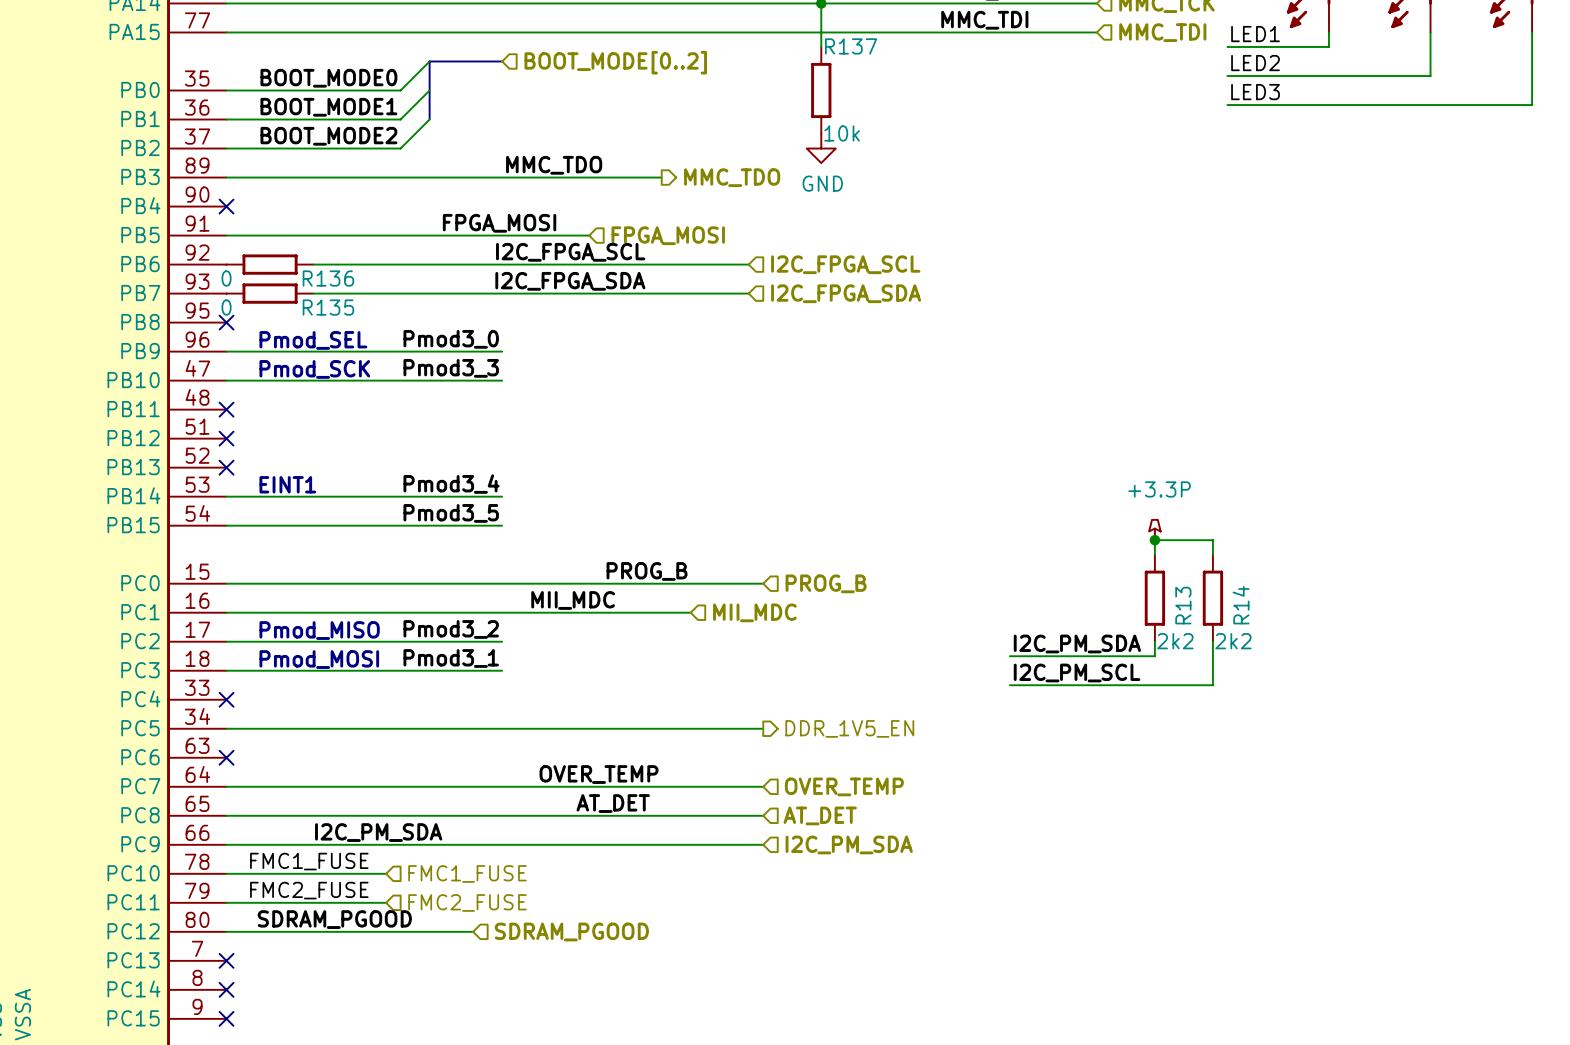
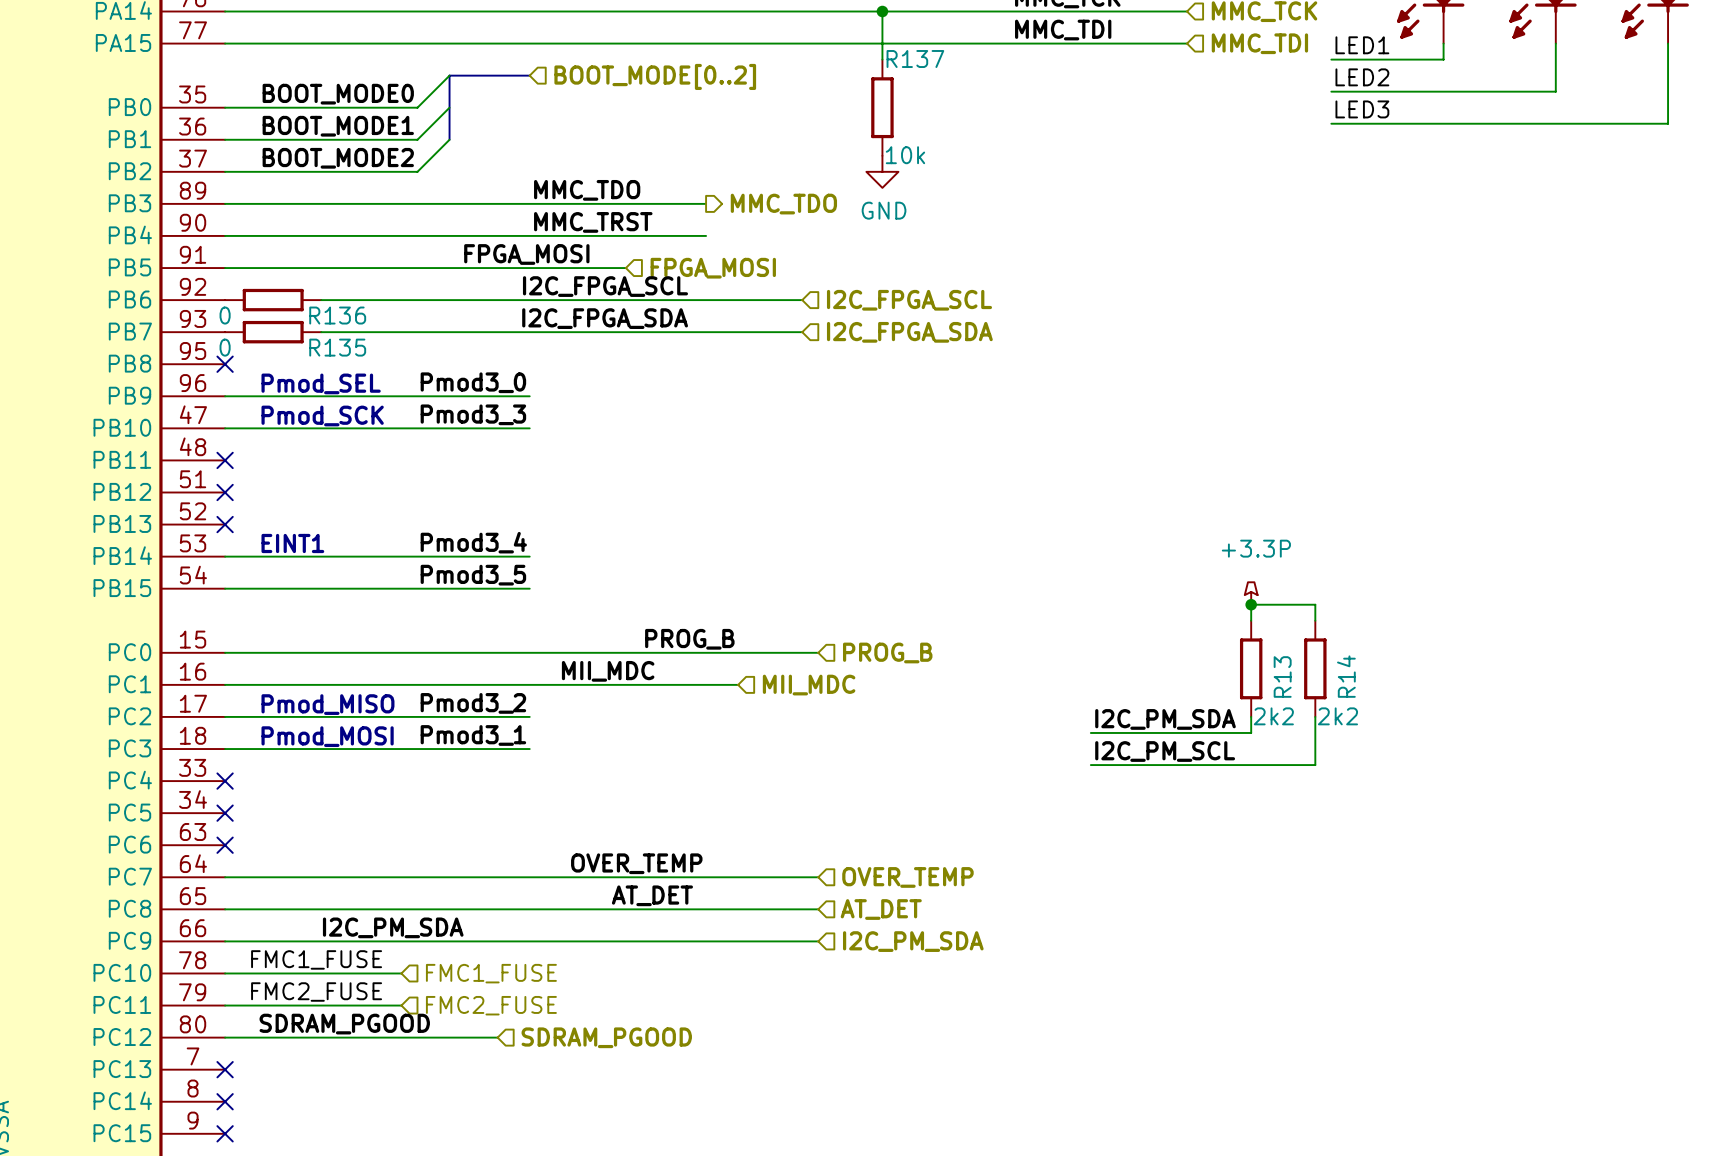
label: none -> MMC_TRST (593, 222)
wire: none -> (225, 235) (706, 235)
no-connect mark: (226, 206) -> none
wire: (226, 728) (763, 728) -> none
no-connect mark: none -> (225, 813)
hierarchical label: DDR_1V5_EN (849, 728) -> none

